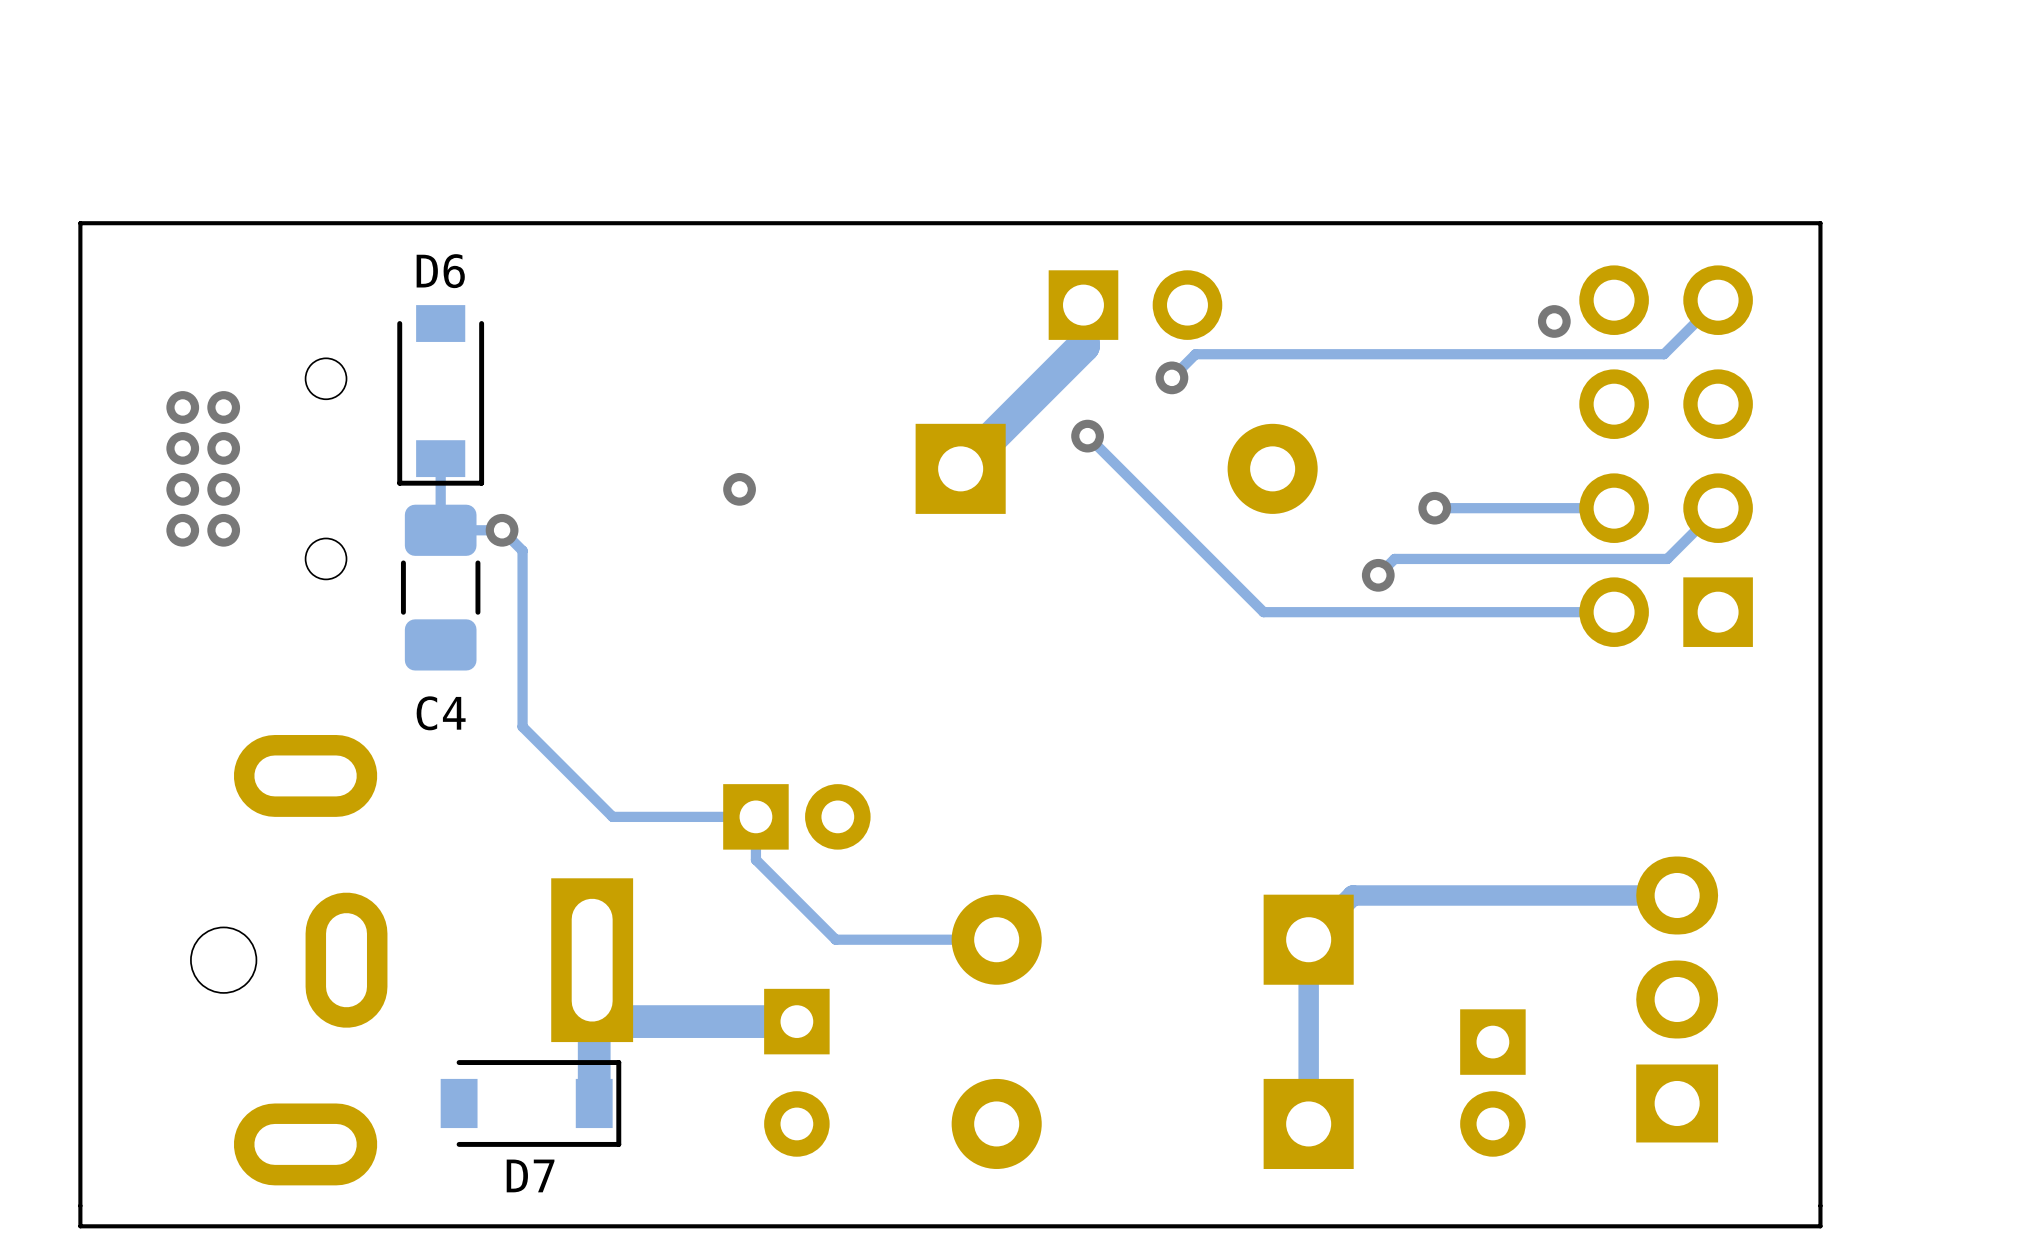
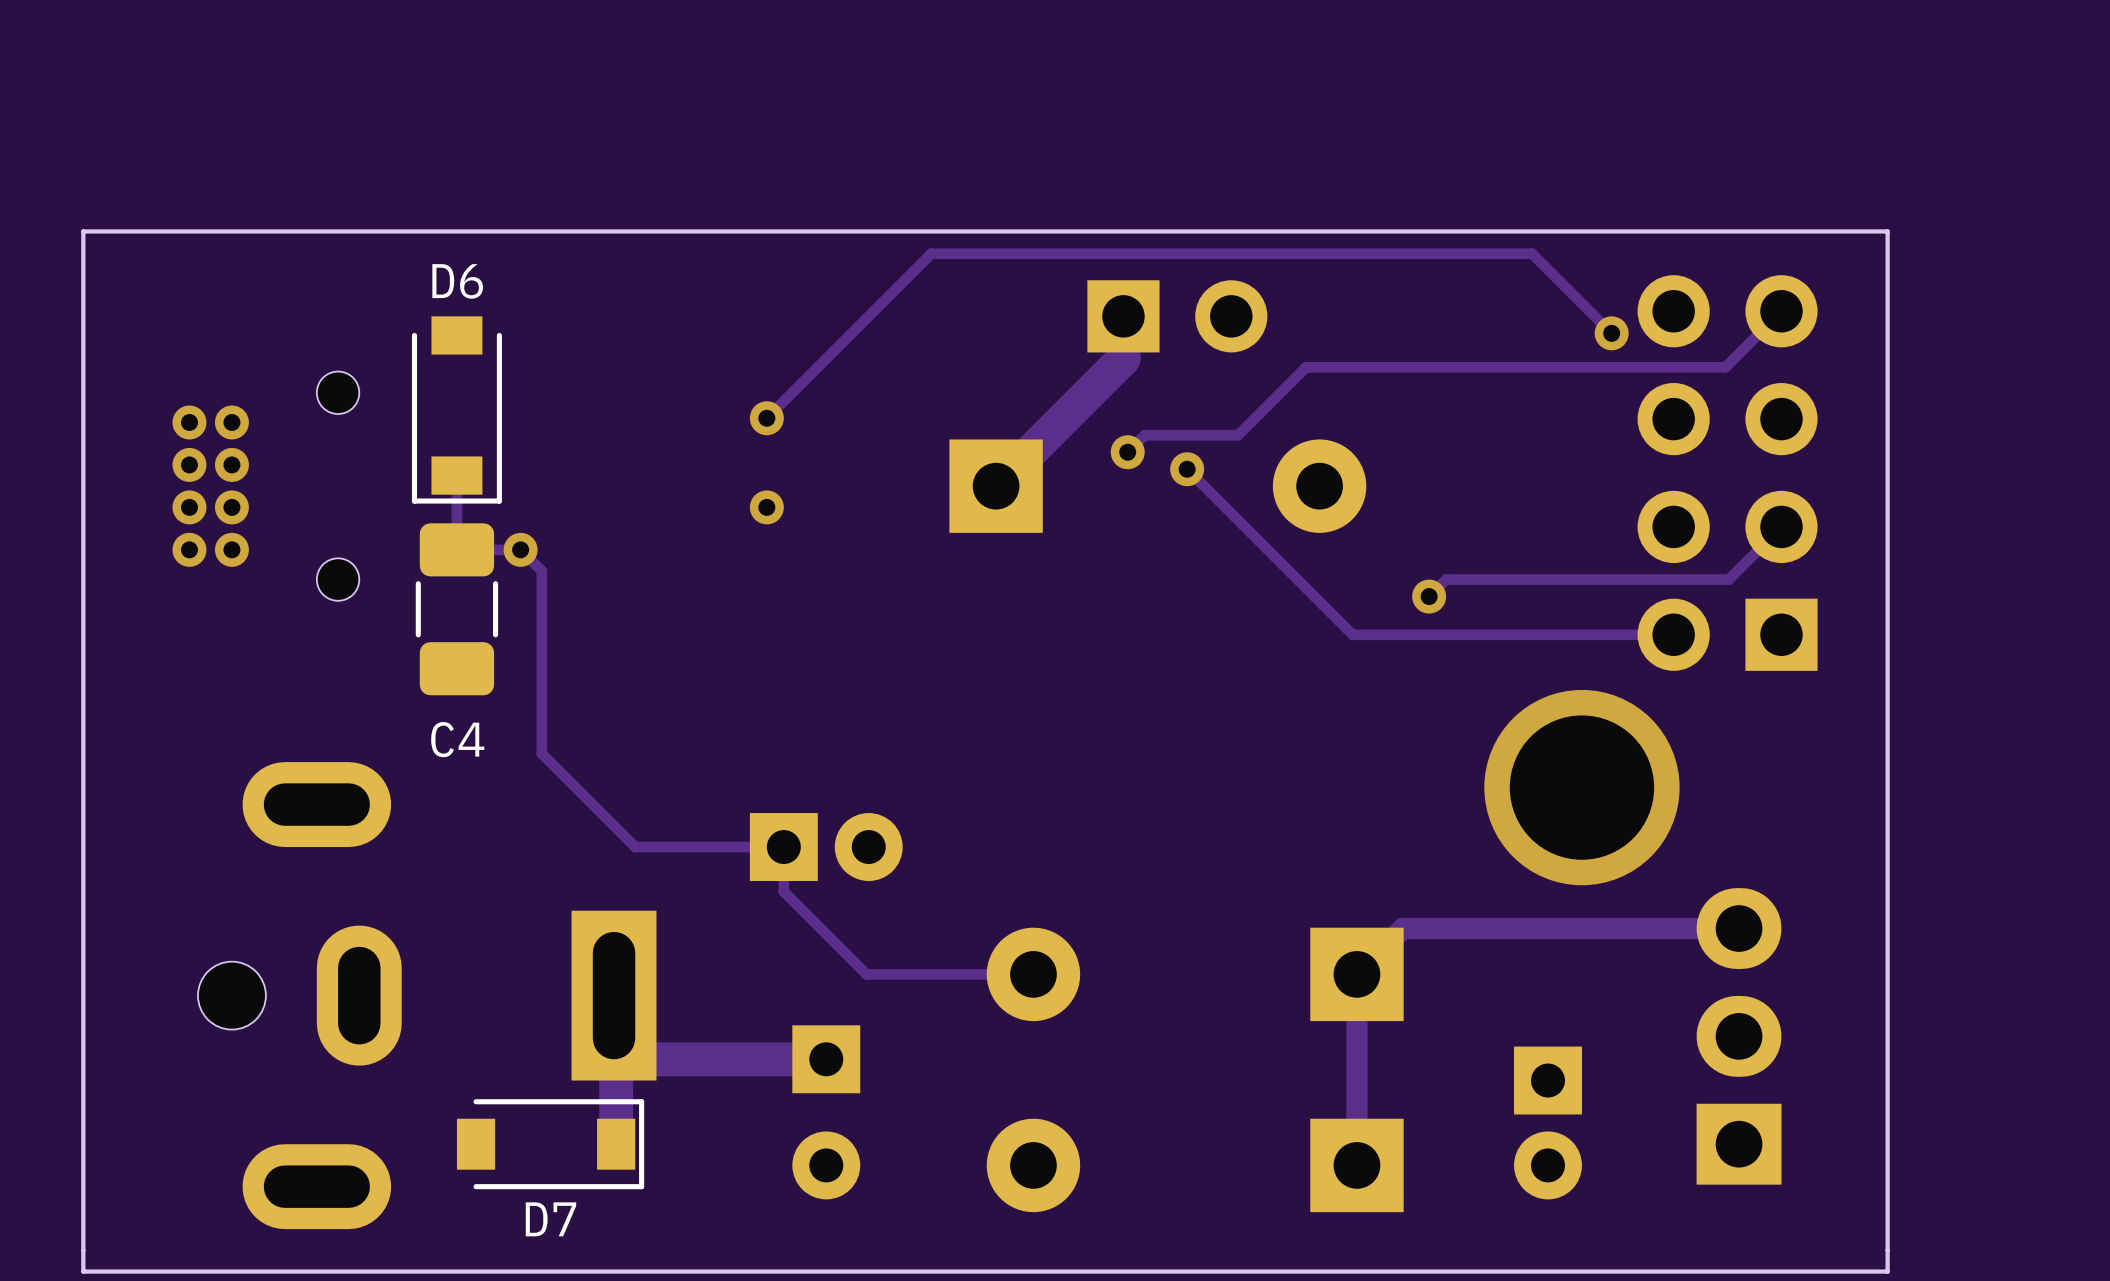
track: none -> (1611, 333) (1532, 253) (931, 253) (766, 418)
track: (1259, 354) (1195, 354) (1171, 377) -> (1306, 367) (1238, 435) (1144, 435) (1127, 452)
via position: (1171, 377) -> (1187, 469)
via: none -> (766, 418)
track: (1087, 436) (1263, 612) (1304, 612) -> (1187, 469) (1352, 634)
via: (1434, 508) -> none
track: (1614, 508) (1434, 508) -> none
via: none -> (1581, 787)

